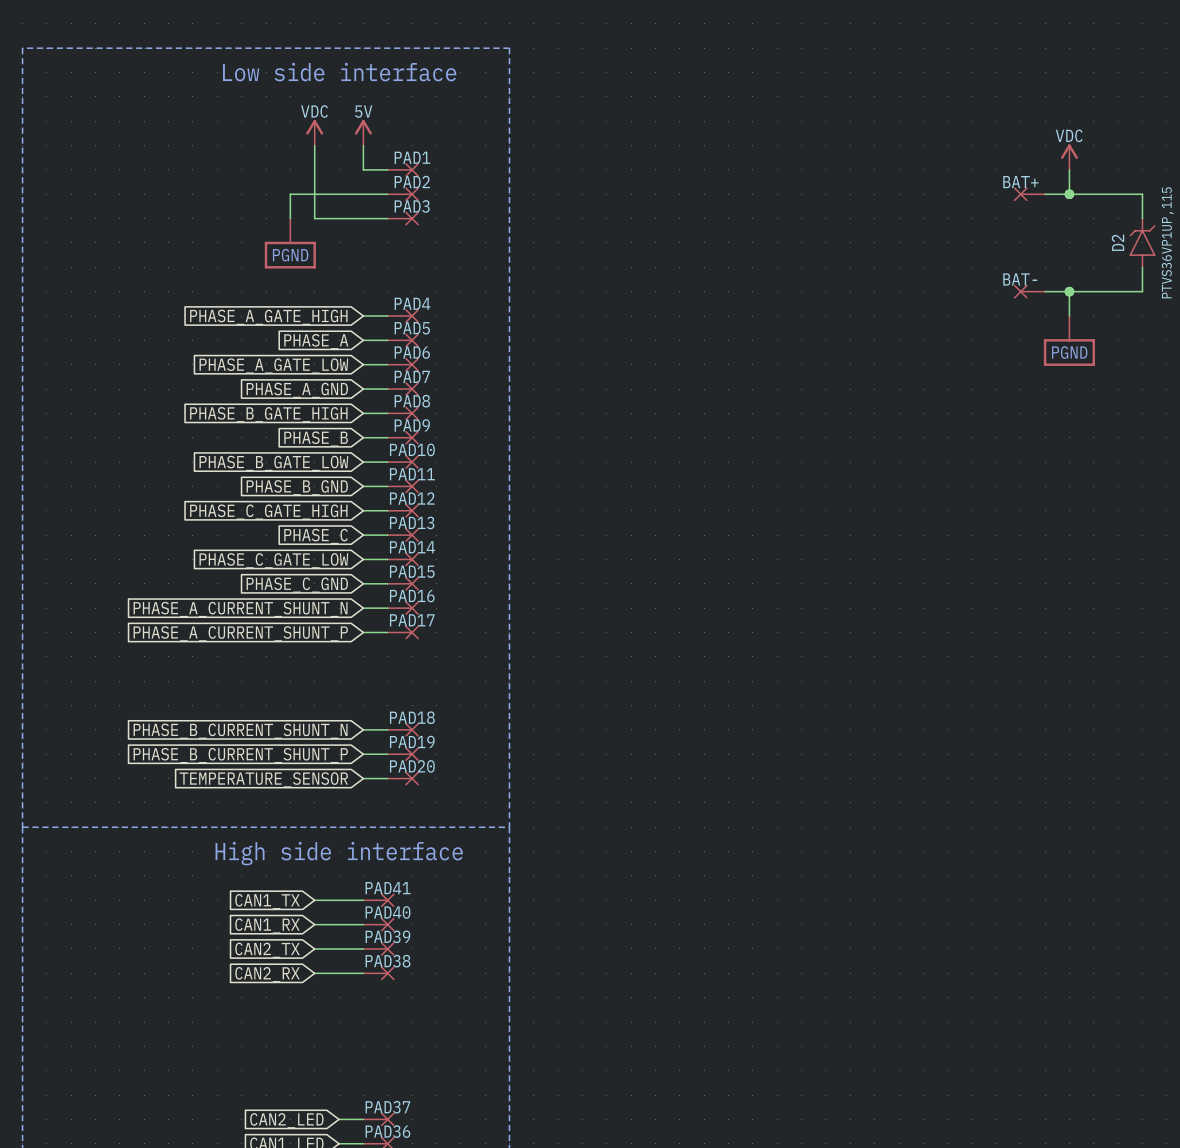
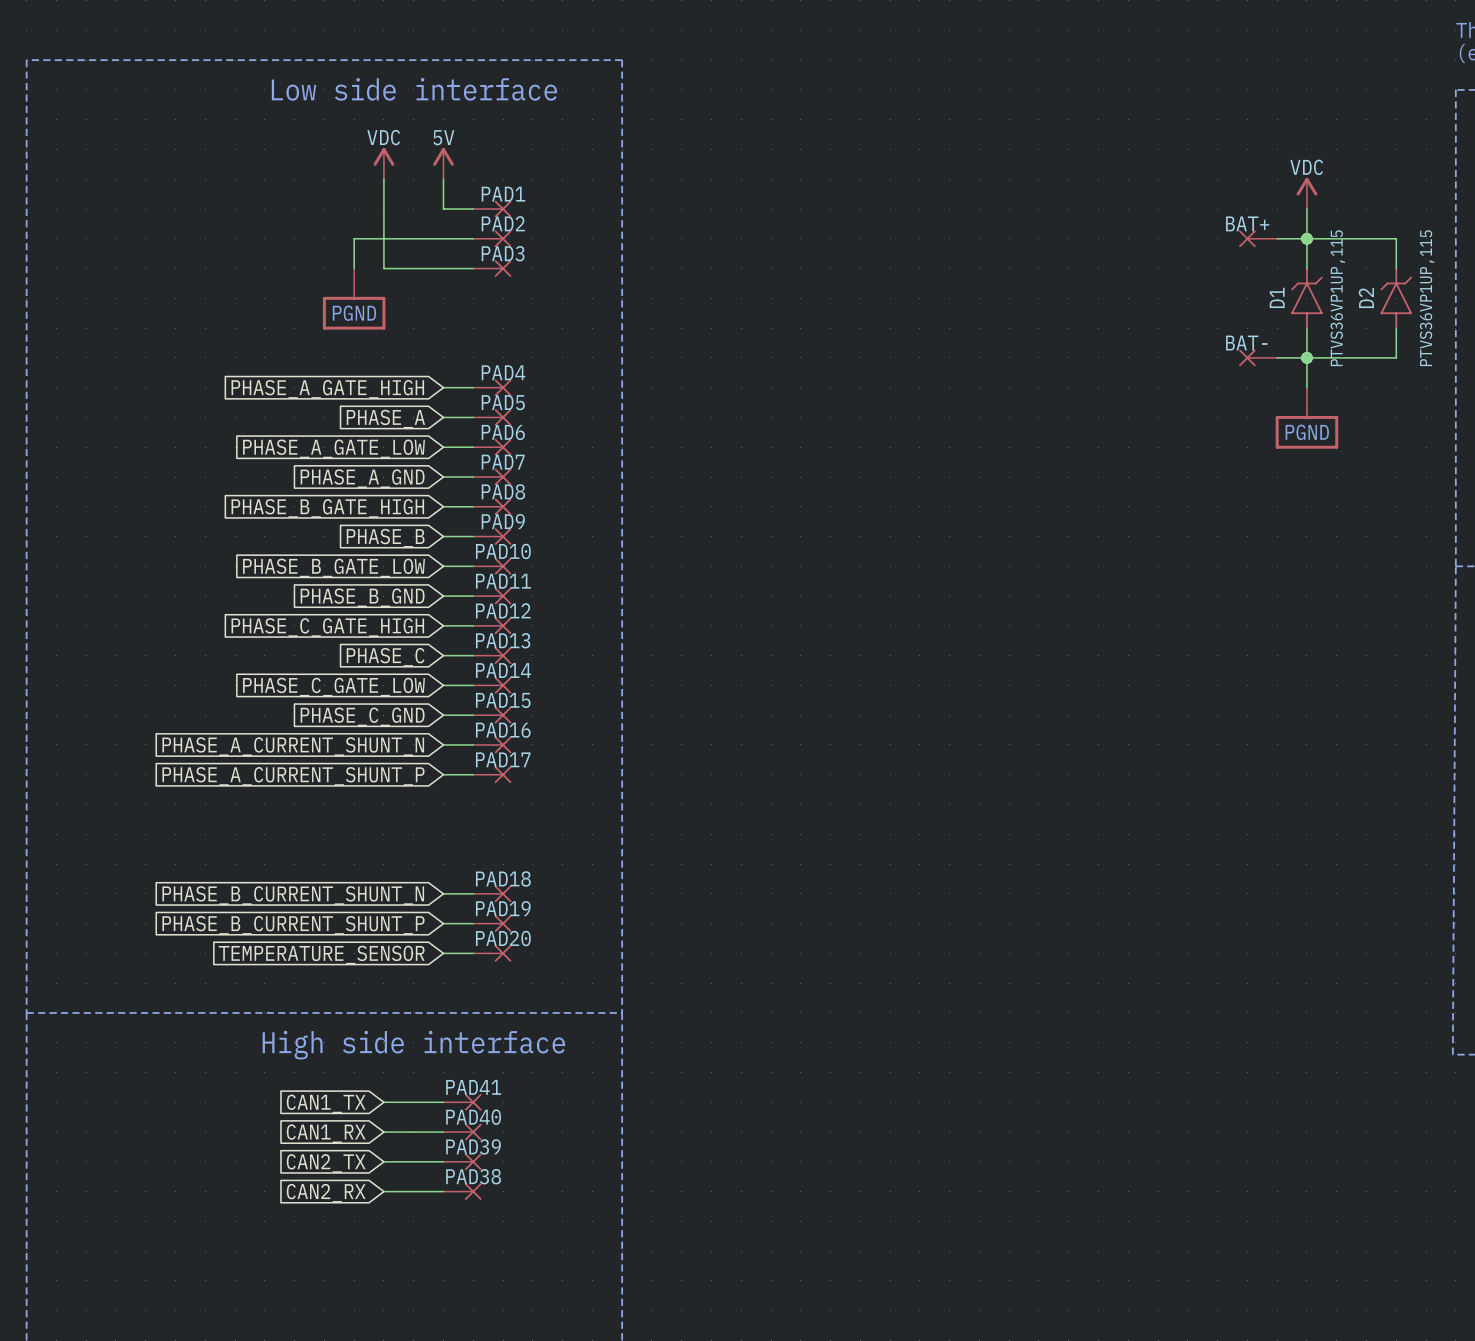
wire: none -> (1306, 238) (1306, 268)
D1: none -> (1306, 298)
wire: none -> (1306, 328) (1306, 357)

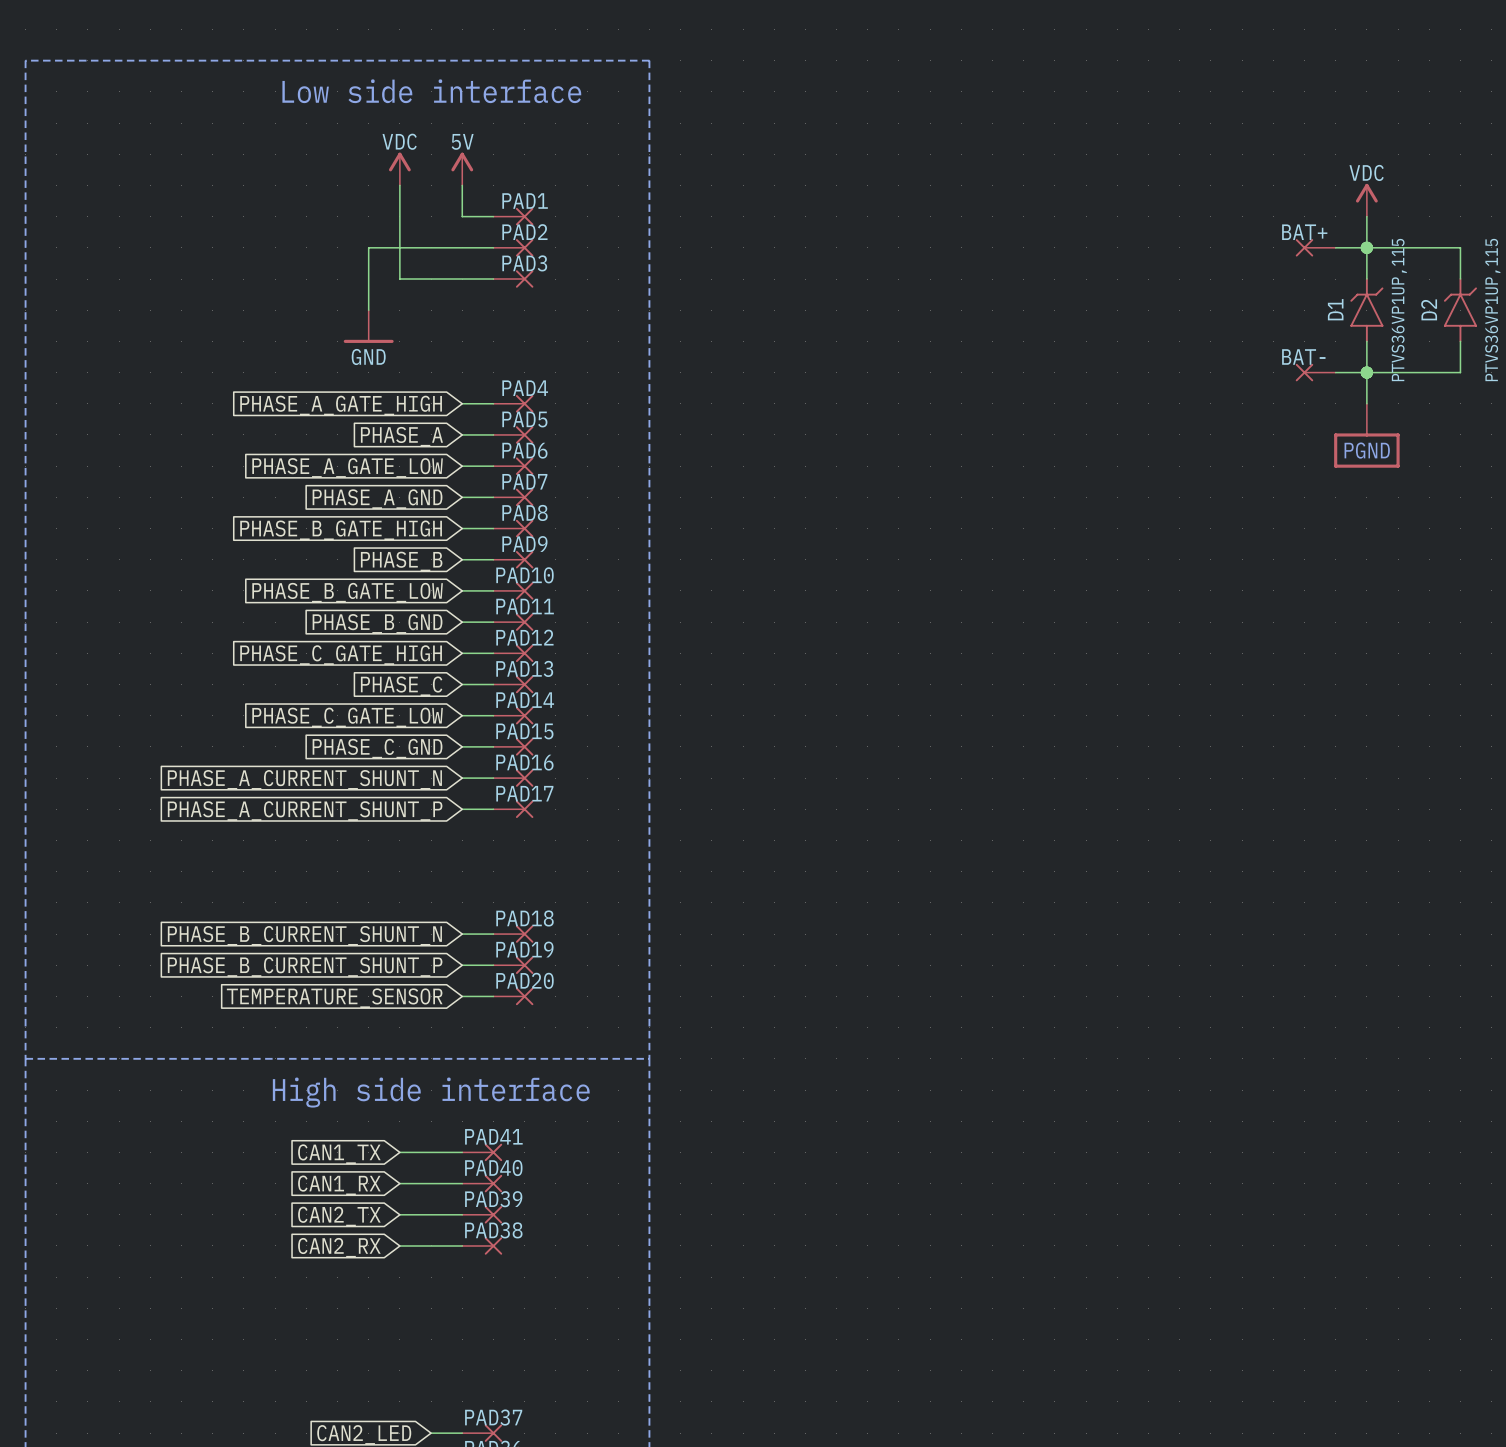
power symbol: PGND (354, 299) -> none
power symbol: none -> GND (368, 326)

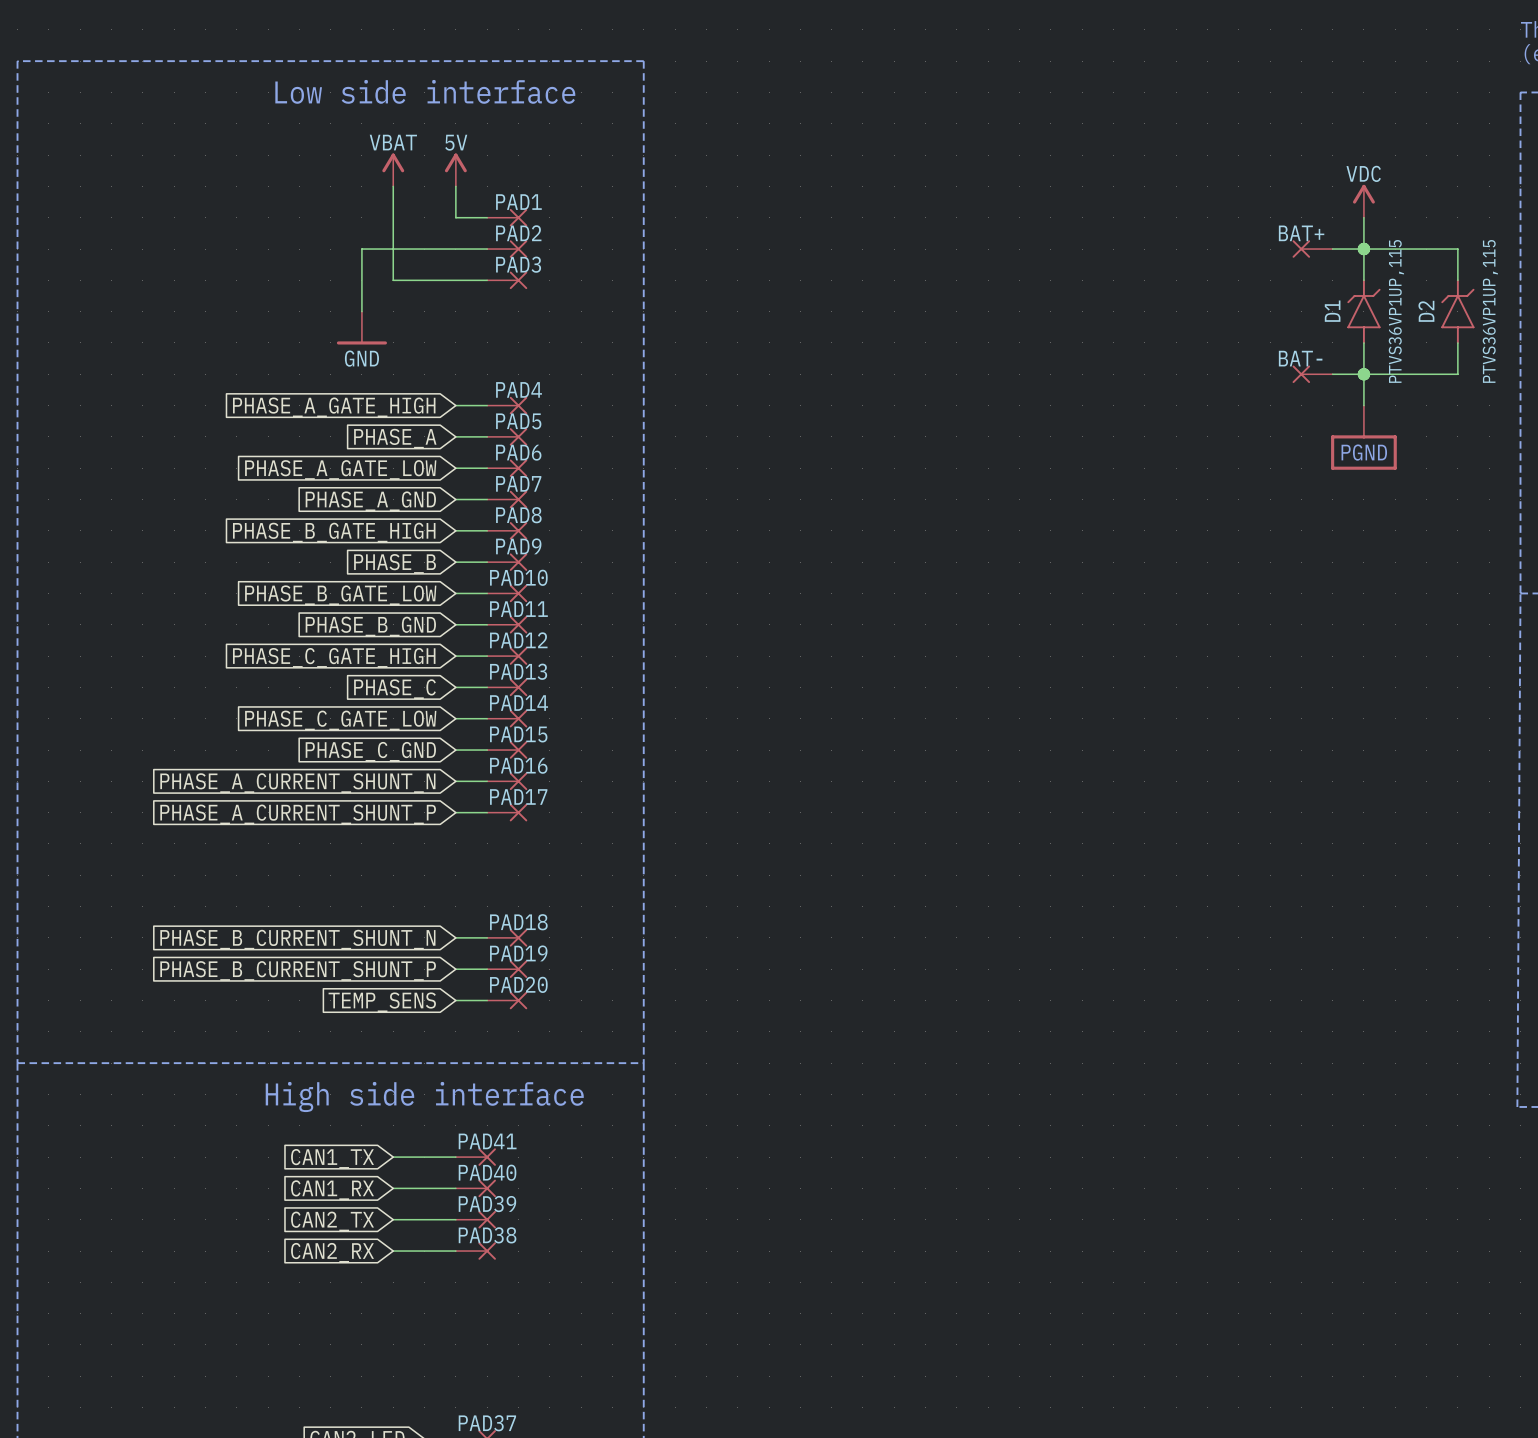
power symbol: VDC (399, 169) -> VBAT (393, 169)
global label: TEMPERATURE_SENSOR (334, 998) -> TEMP_SENS (382, 1002)

